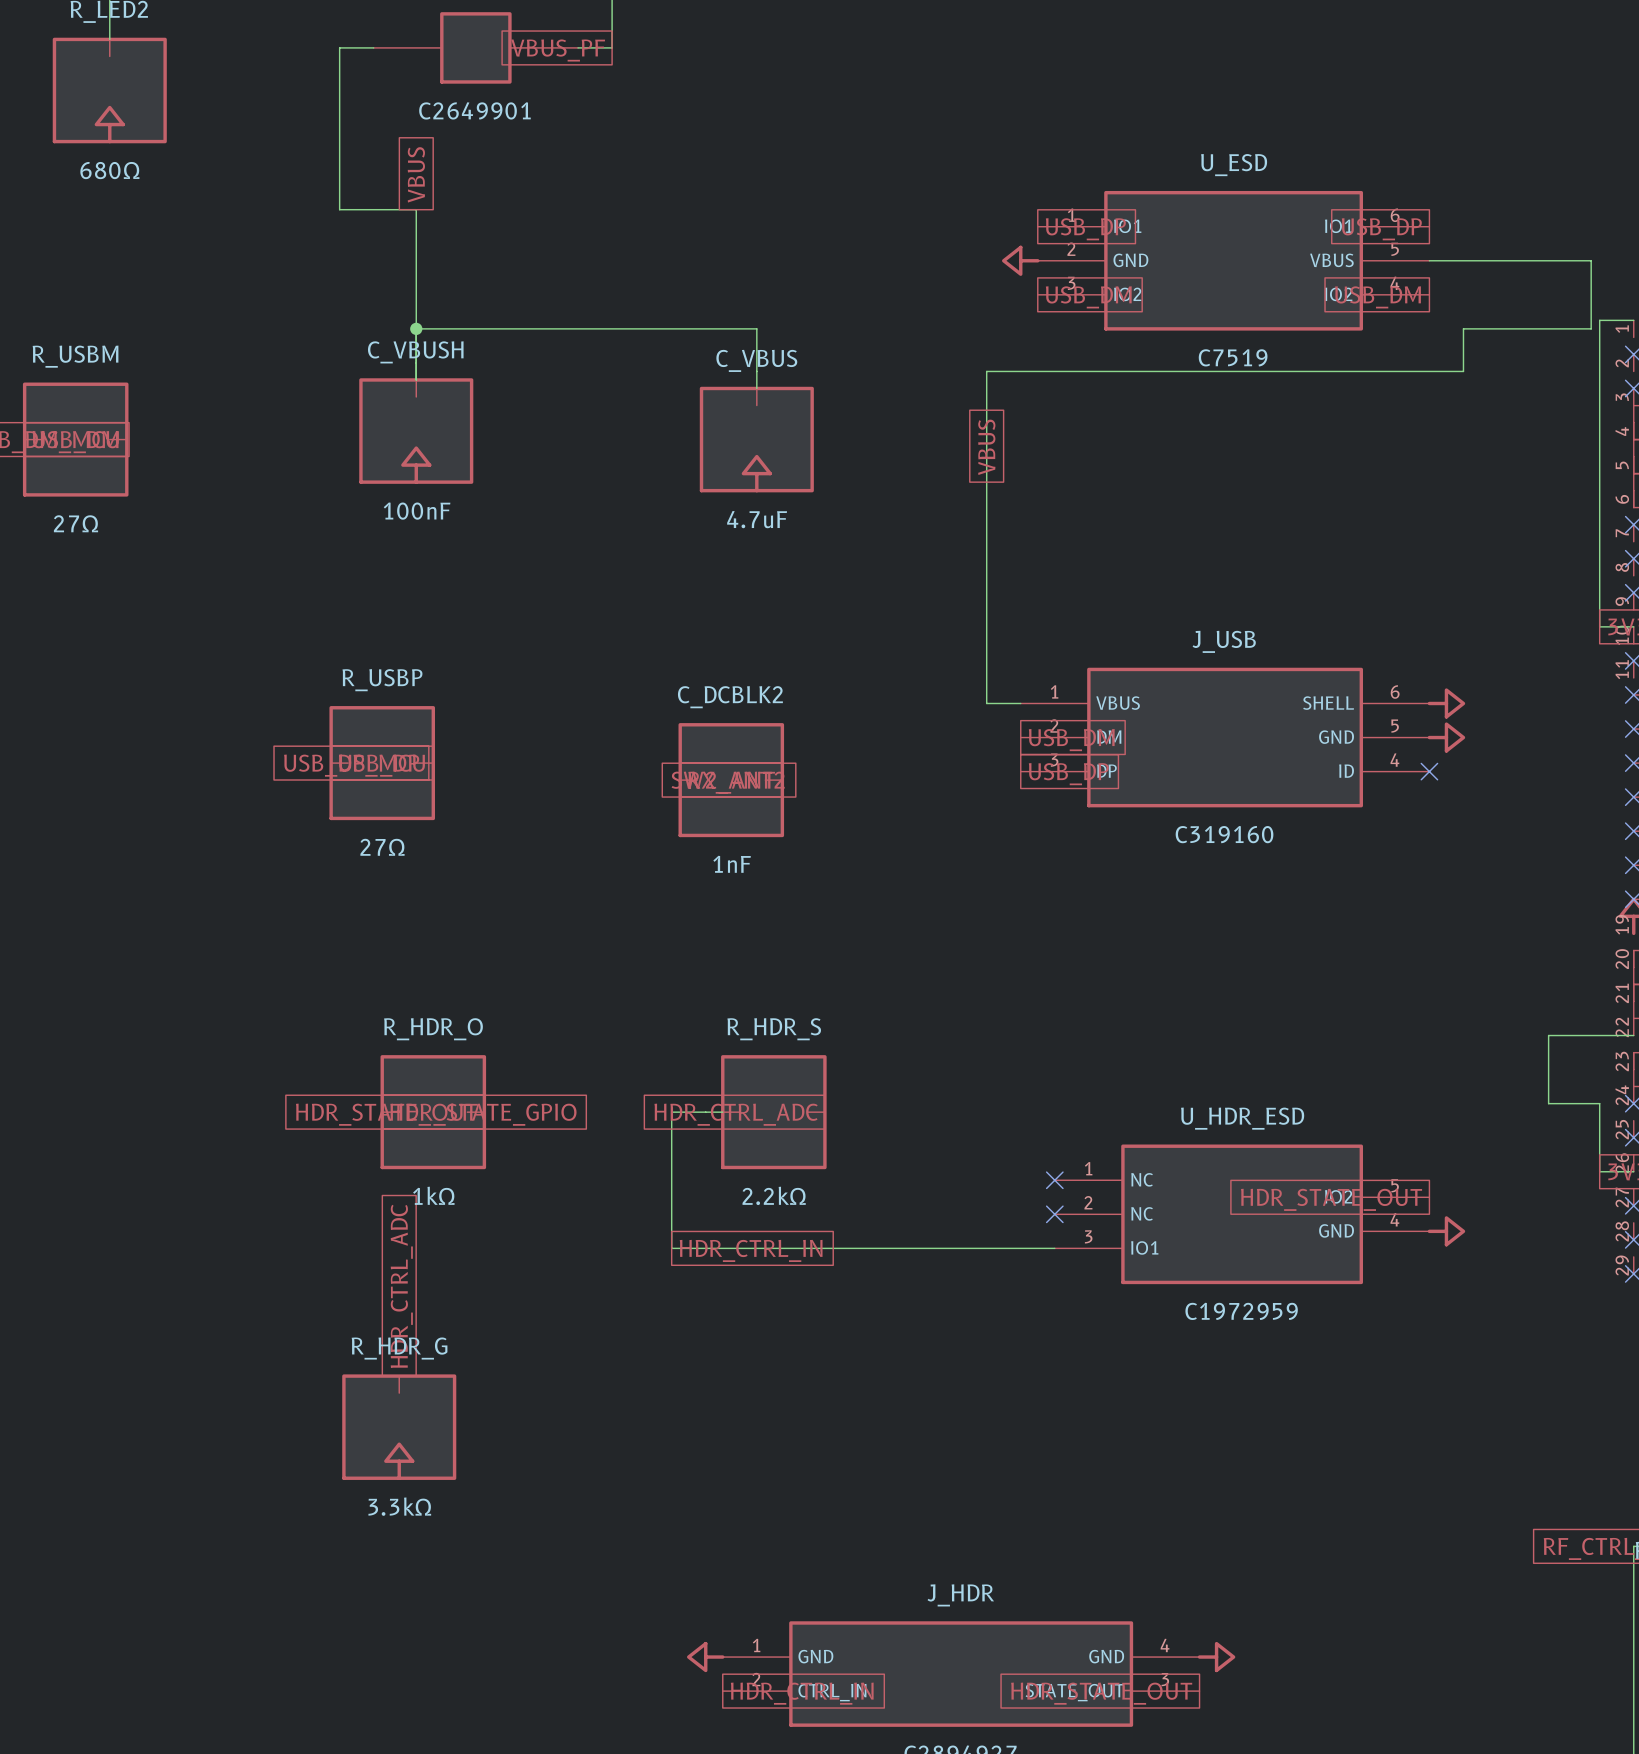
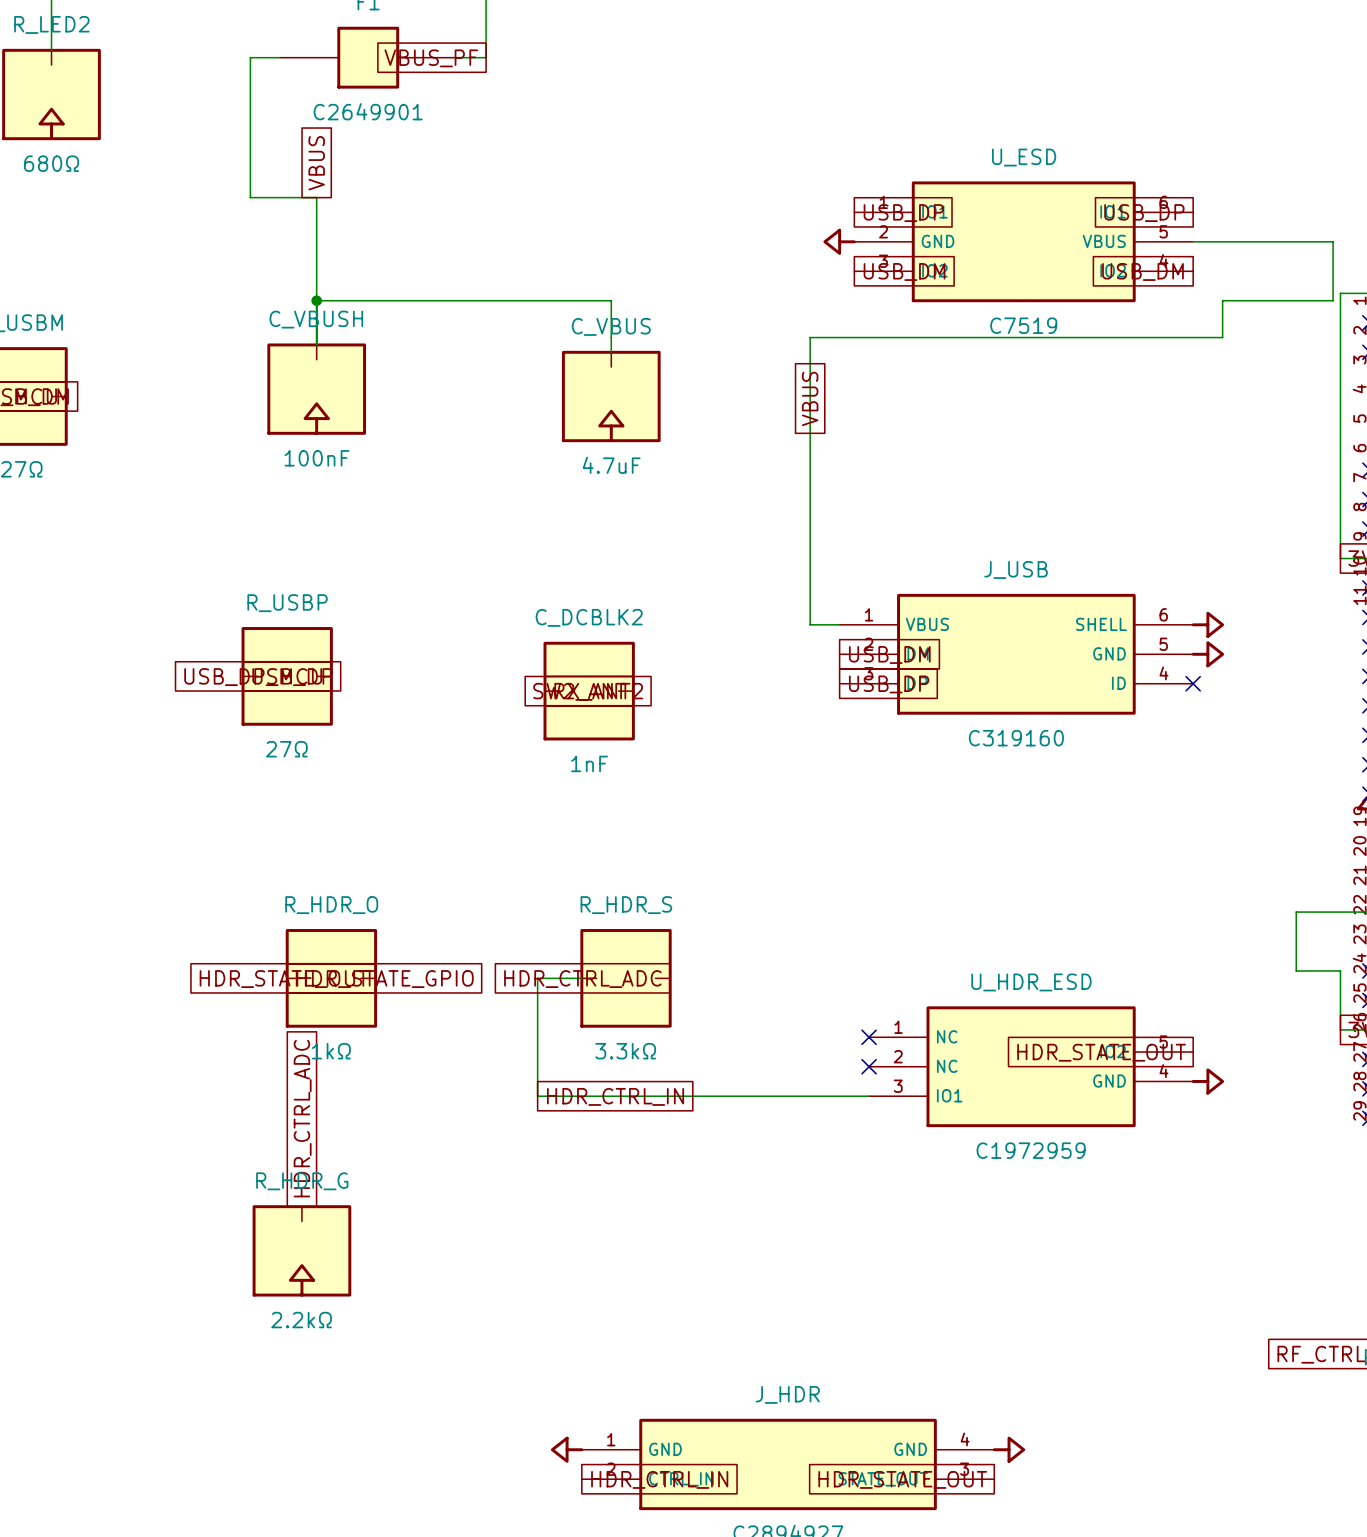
R_HDR_S value: 2.2kΩ (774, 1195) -> 3.3kΩ (625, 1051)
R_HDR_G value: 3.3kΩ (399, 1506) -> 2.2kΩ (301, 1320)

